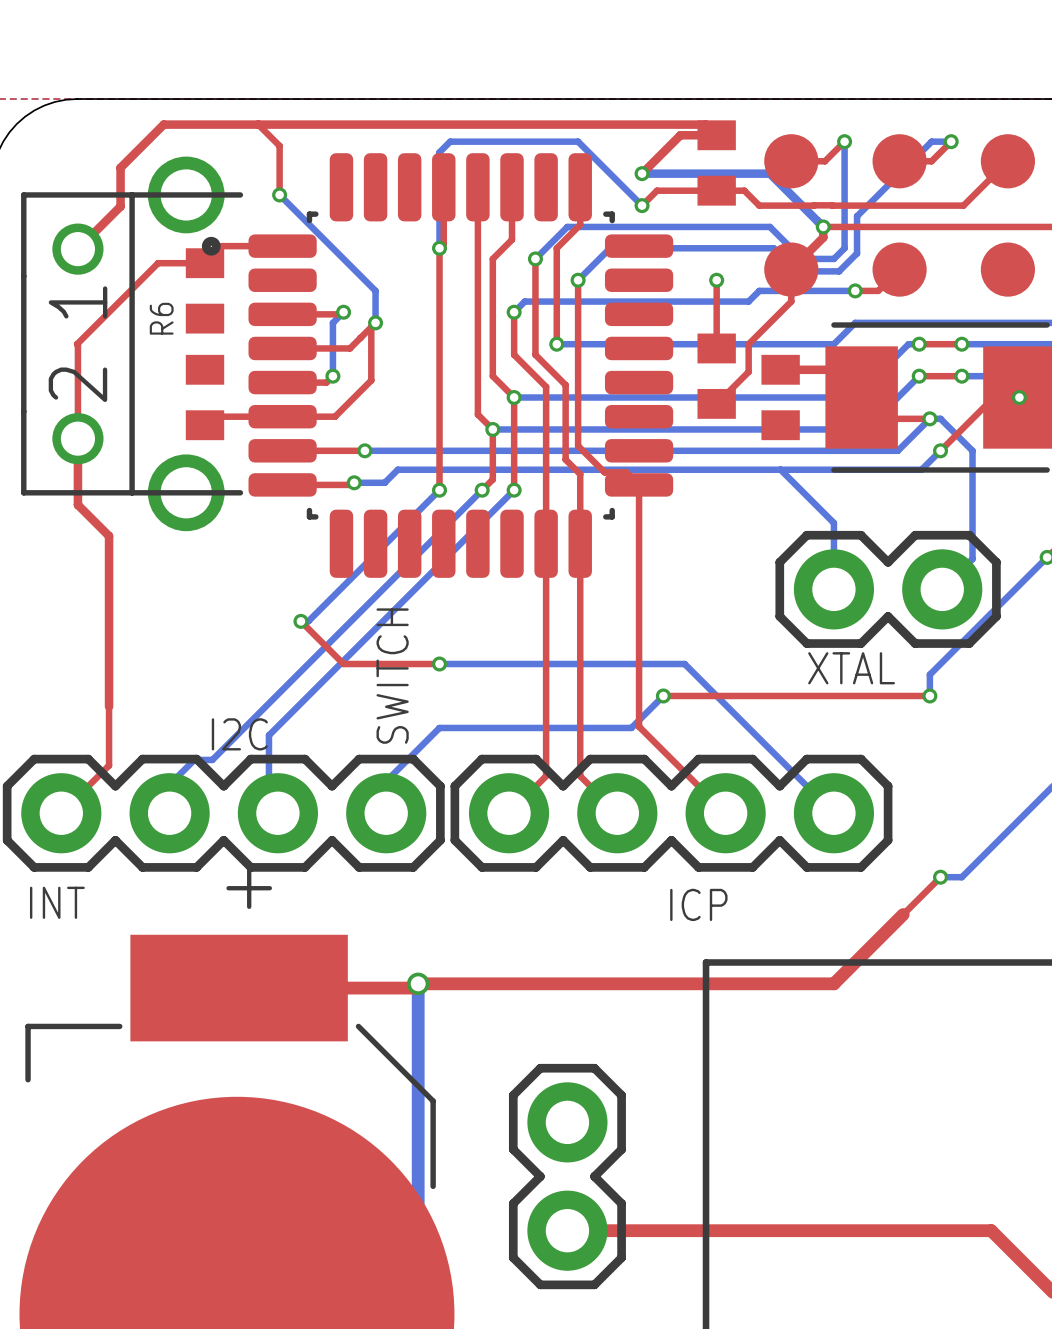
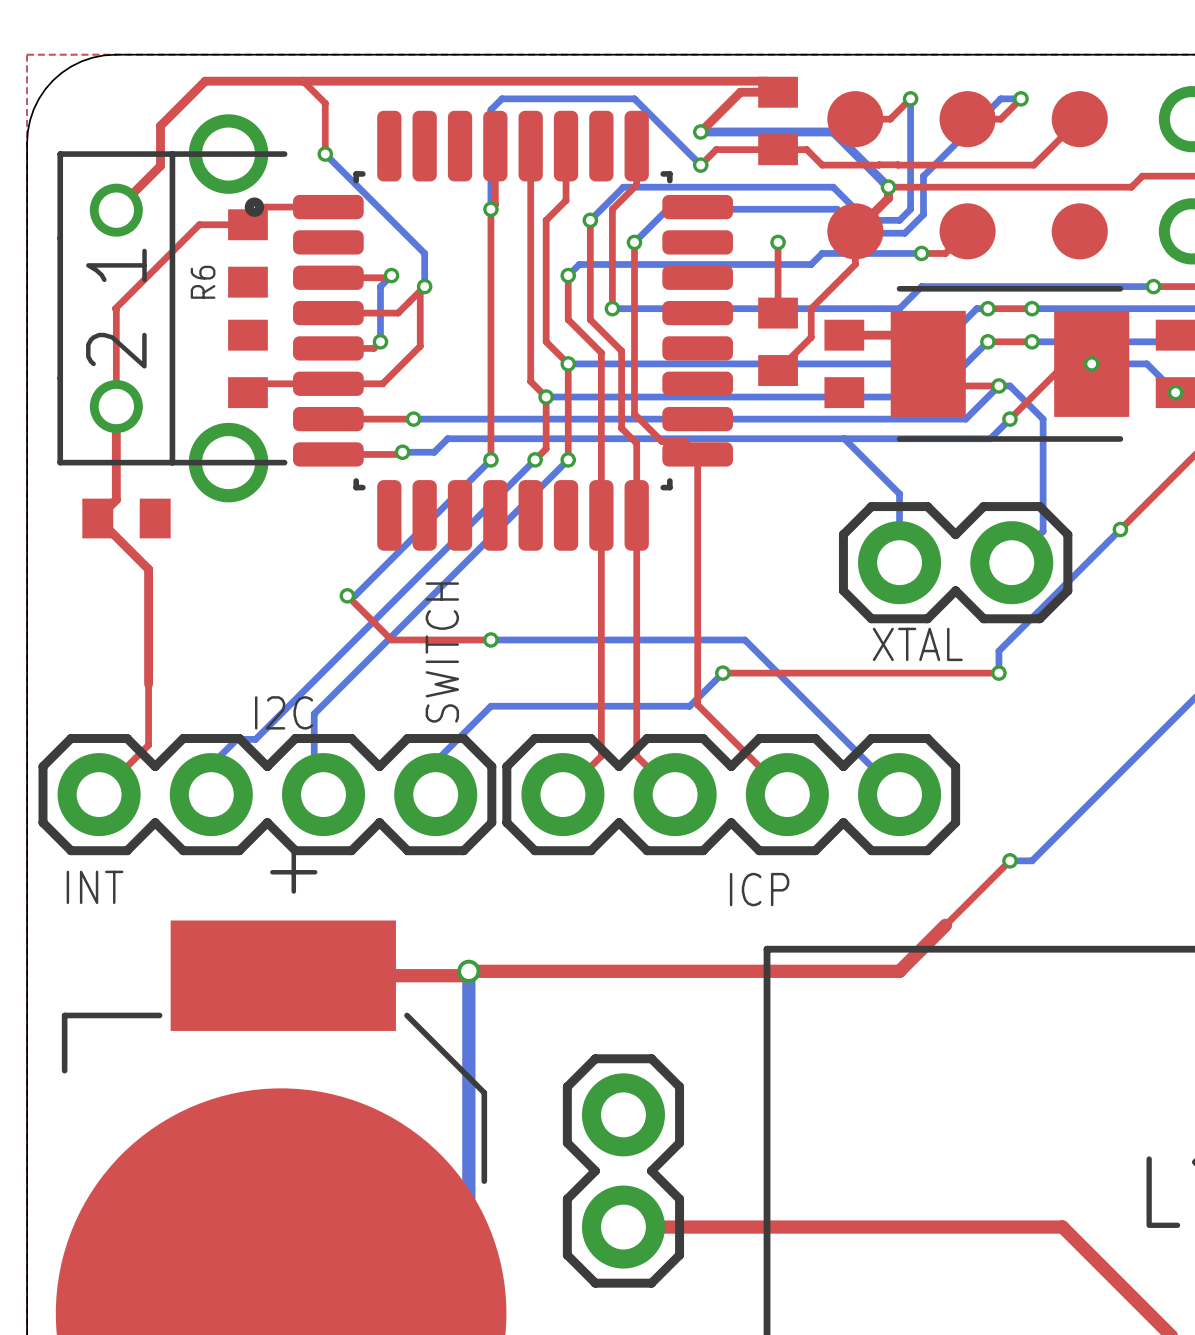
top track: (77, 504) (109, 536) (109, 595) -> (116, 475) (116, 499) (97, 518) (148, 569)
part: none -> (126, 518)
top track width: thick (903, 914) (878, 939) -> thin (971, 899) (945, 925)

